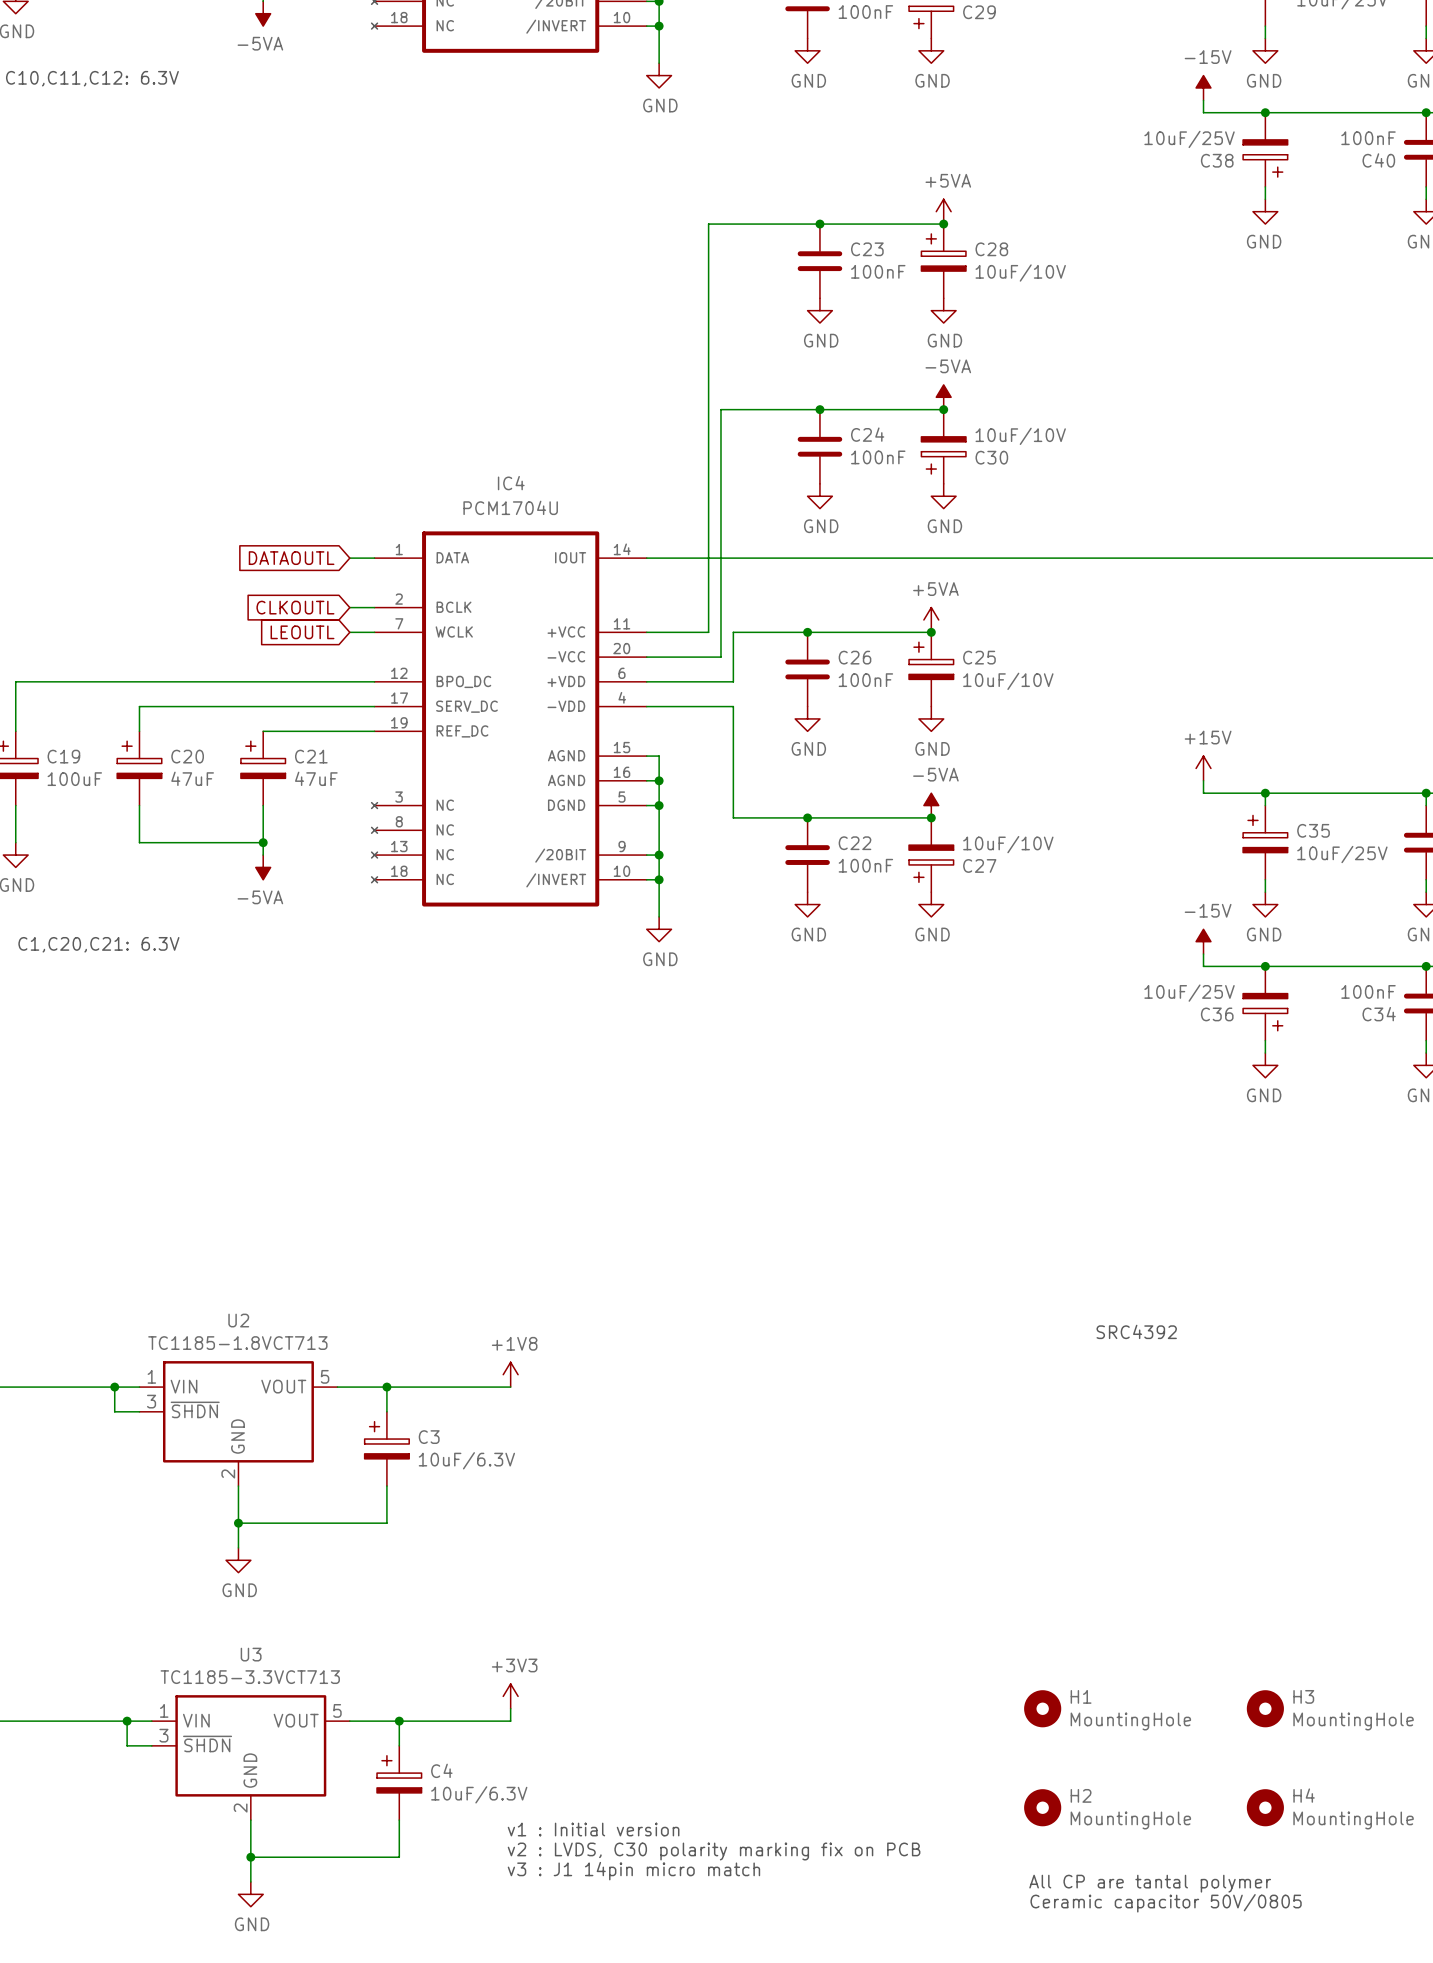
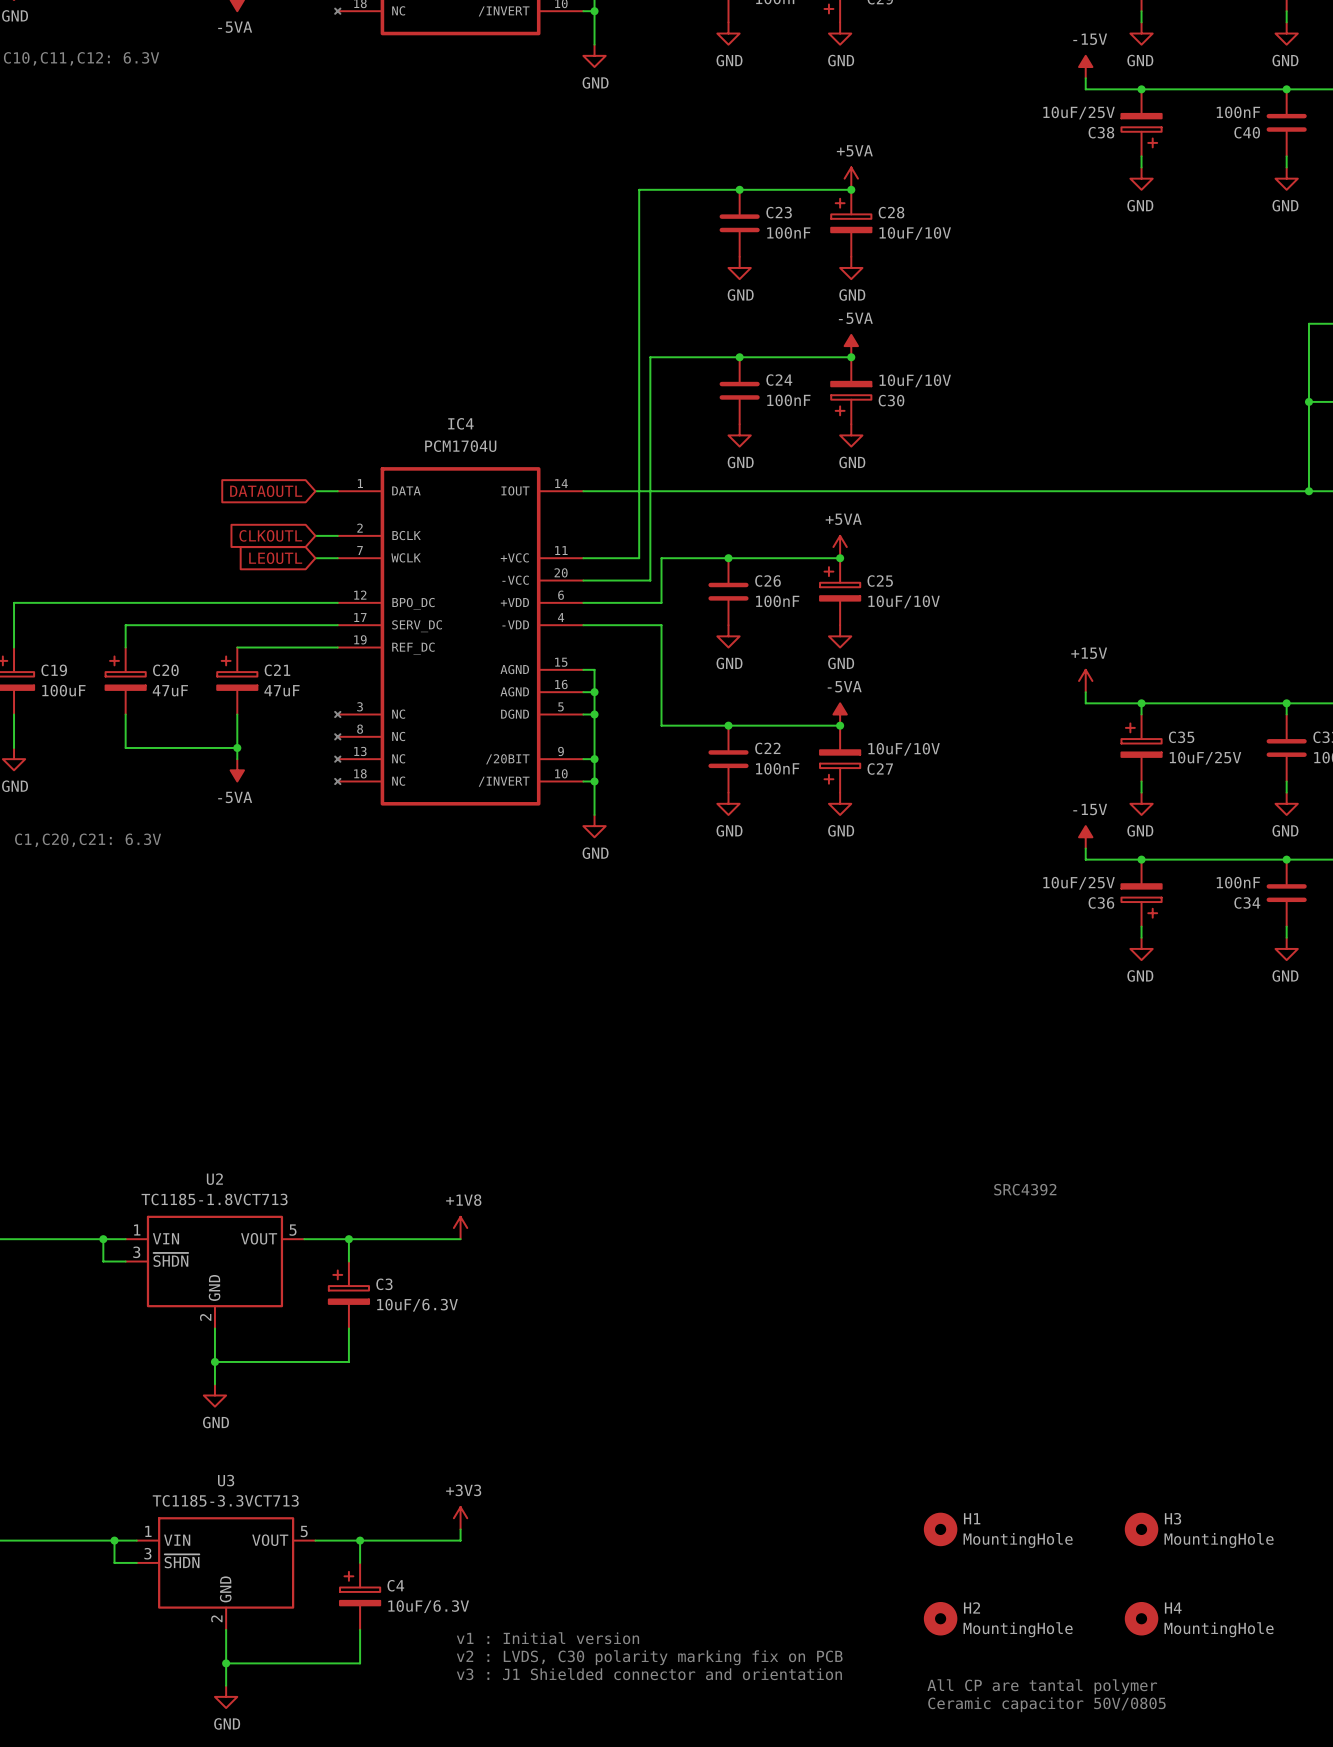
text: v3 : J1 14pin micro match (633, 1871) -> v3 : J1 Shielded connector and orientation (649, 1674)

